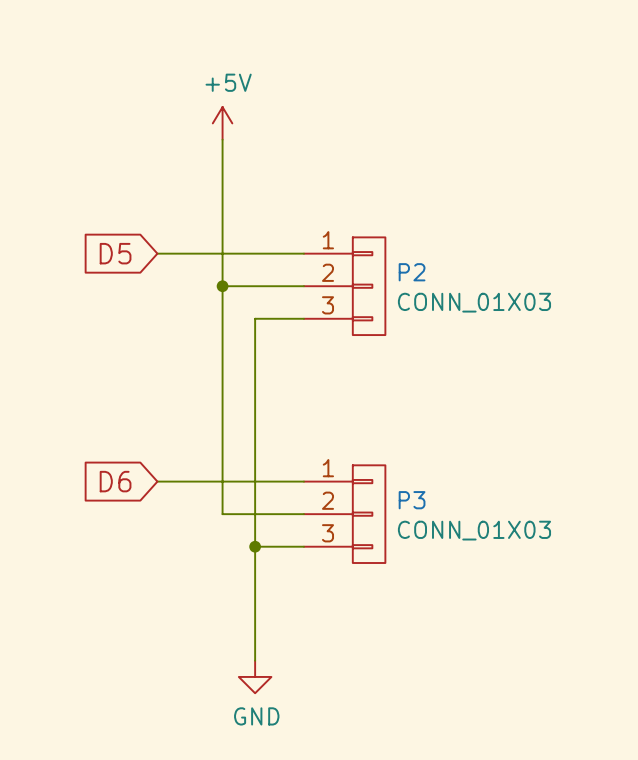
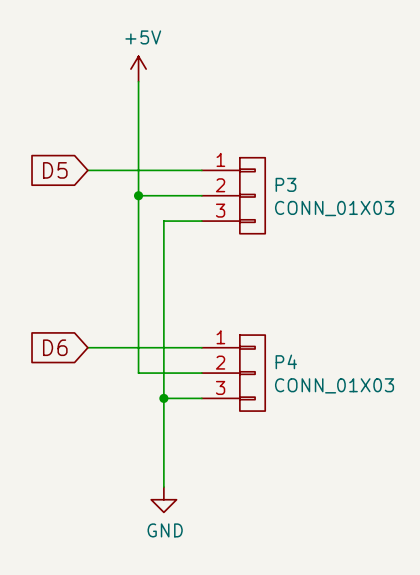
P2 name: P2 (412, 272) -> P3 (285, 184)
P3 name: P3 (412, 500) -> P4 (286, 361)

